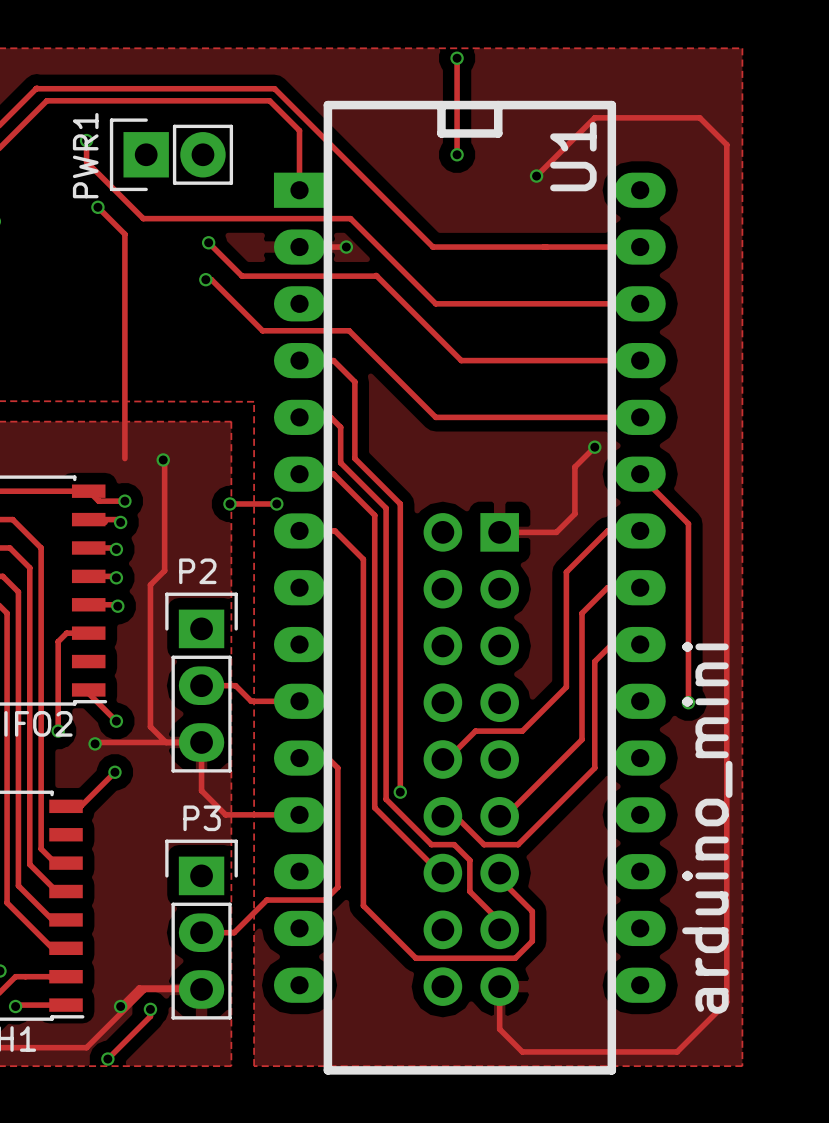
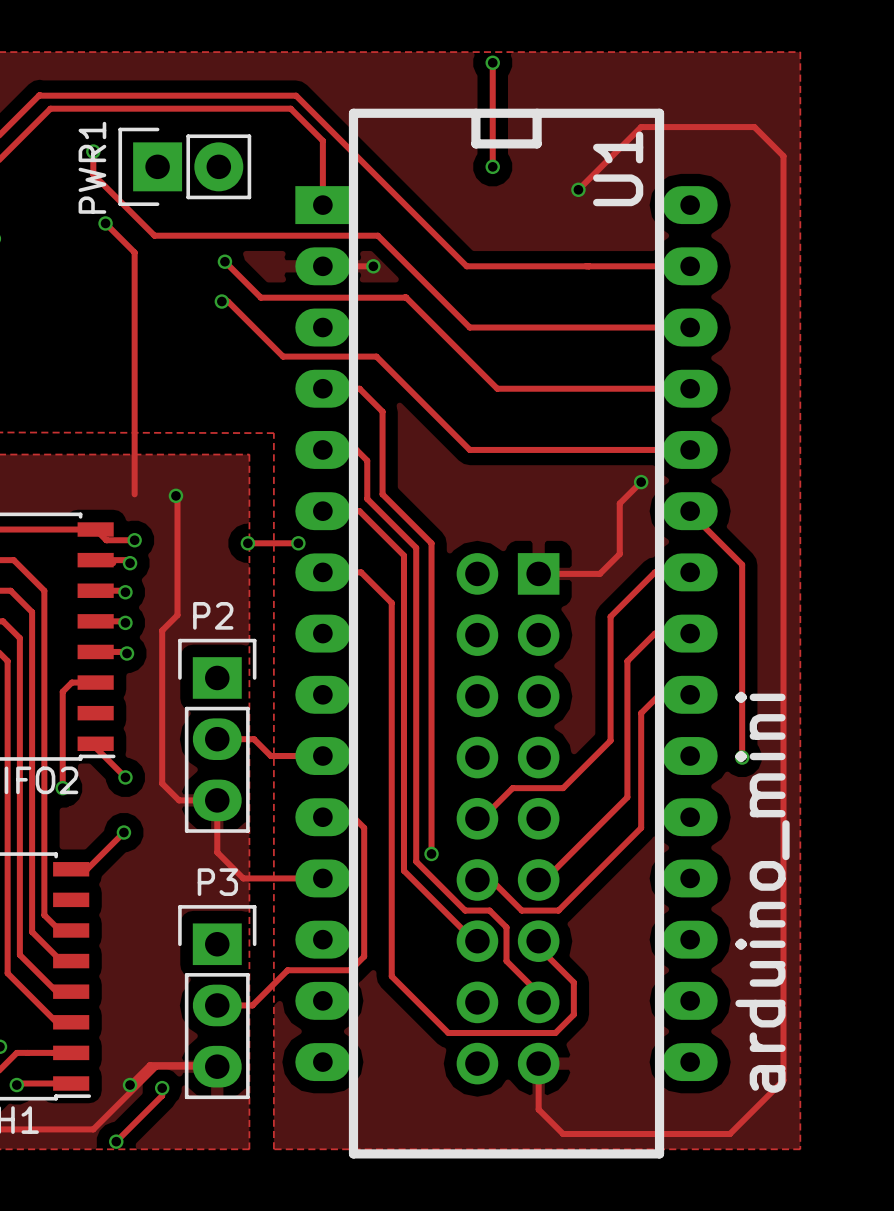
track: (166, 742) (95, 743) -> none
via: (95, 743) -> none

